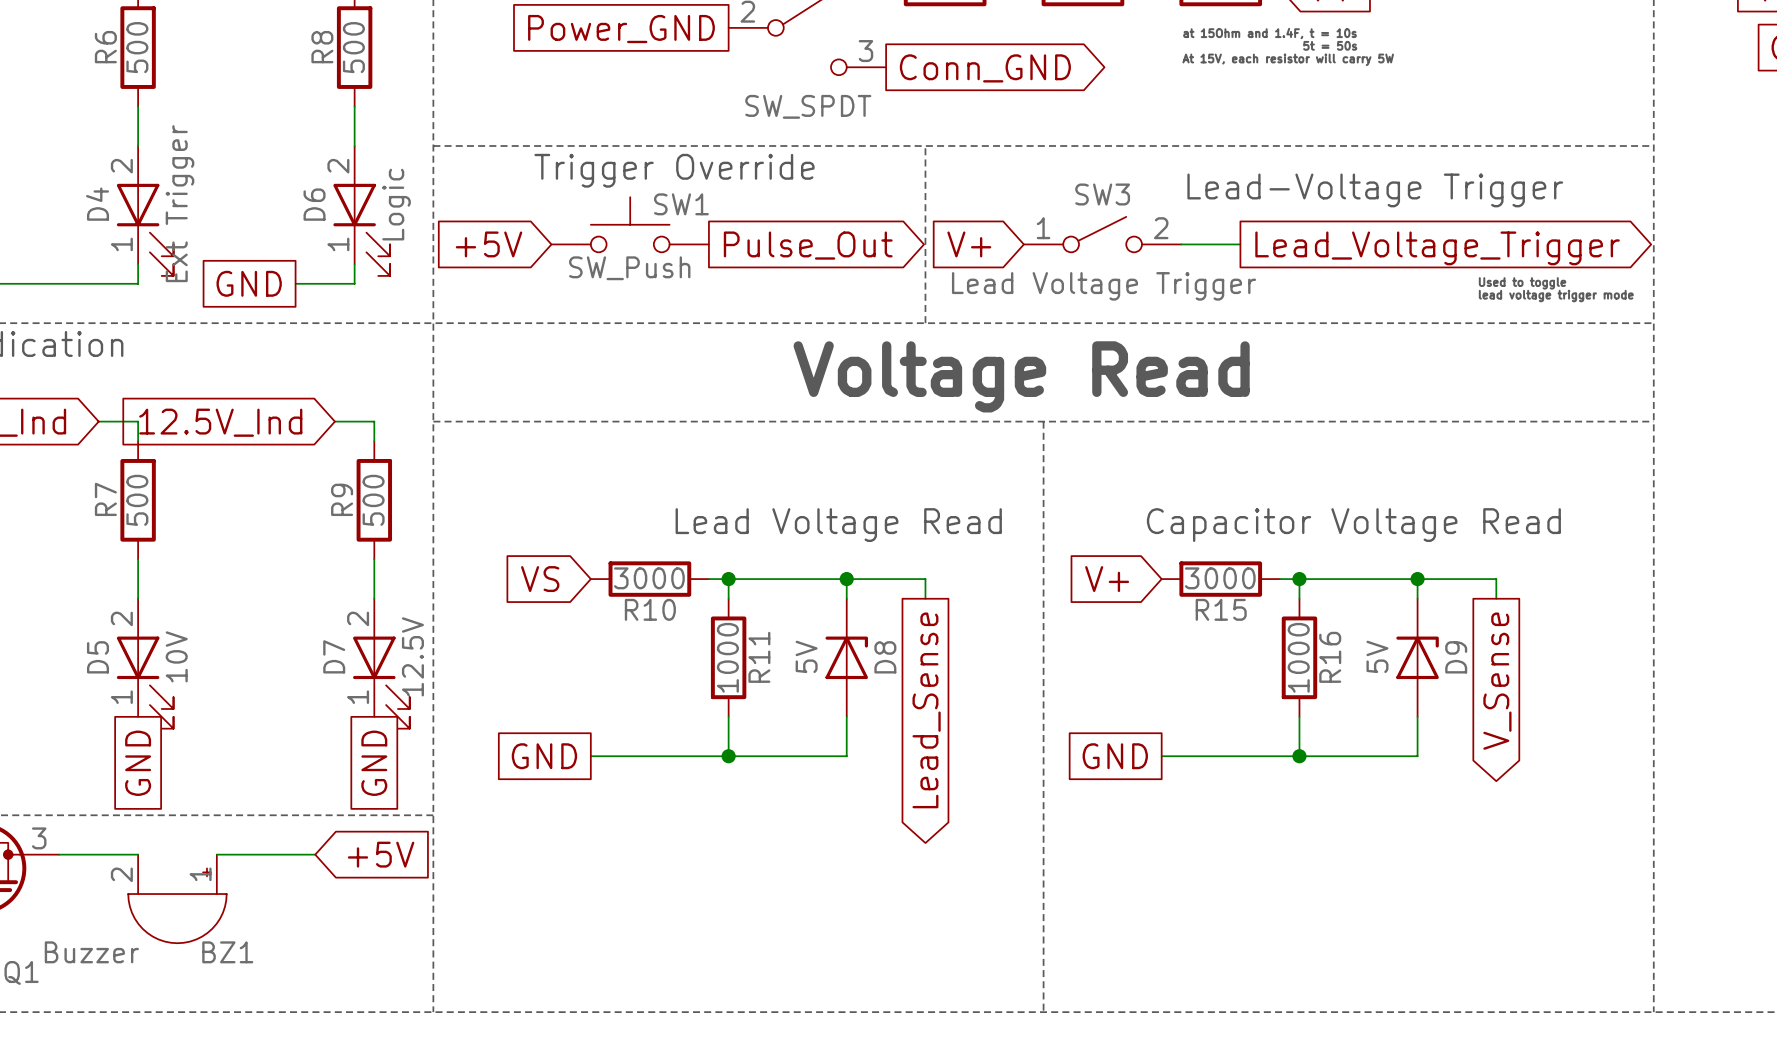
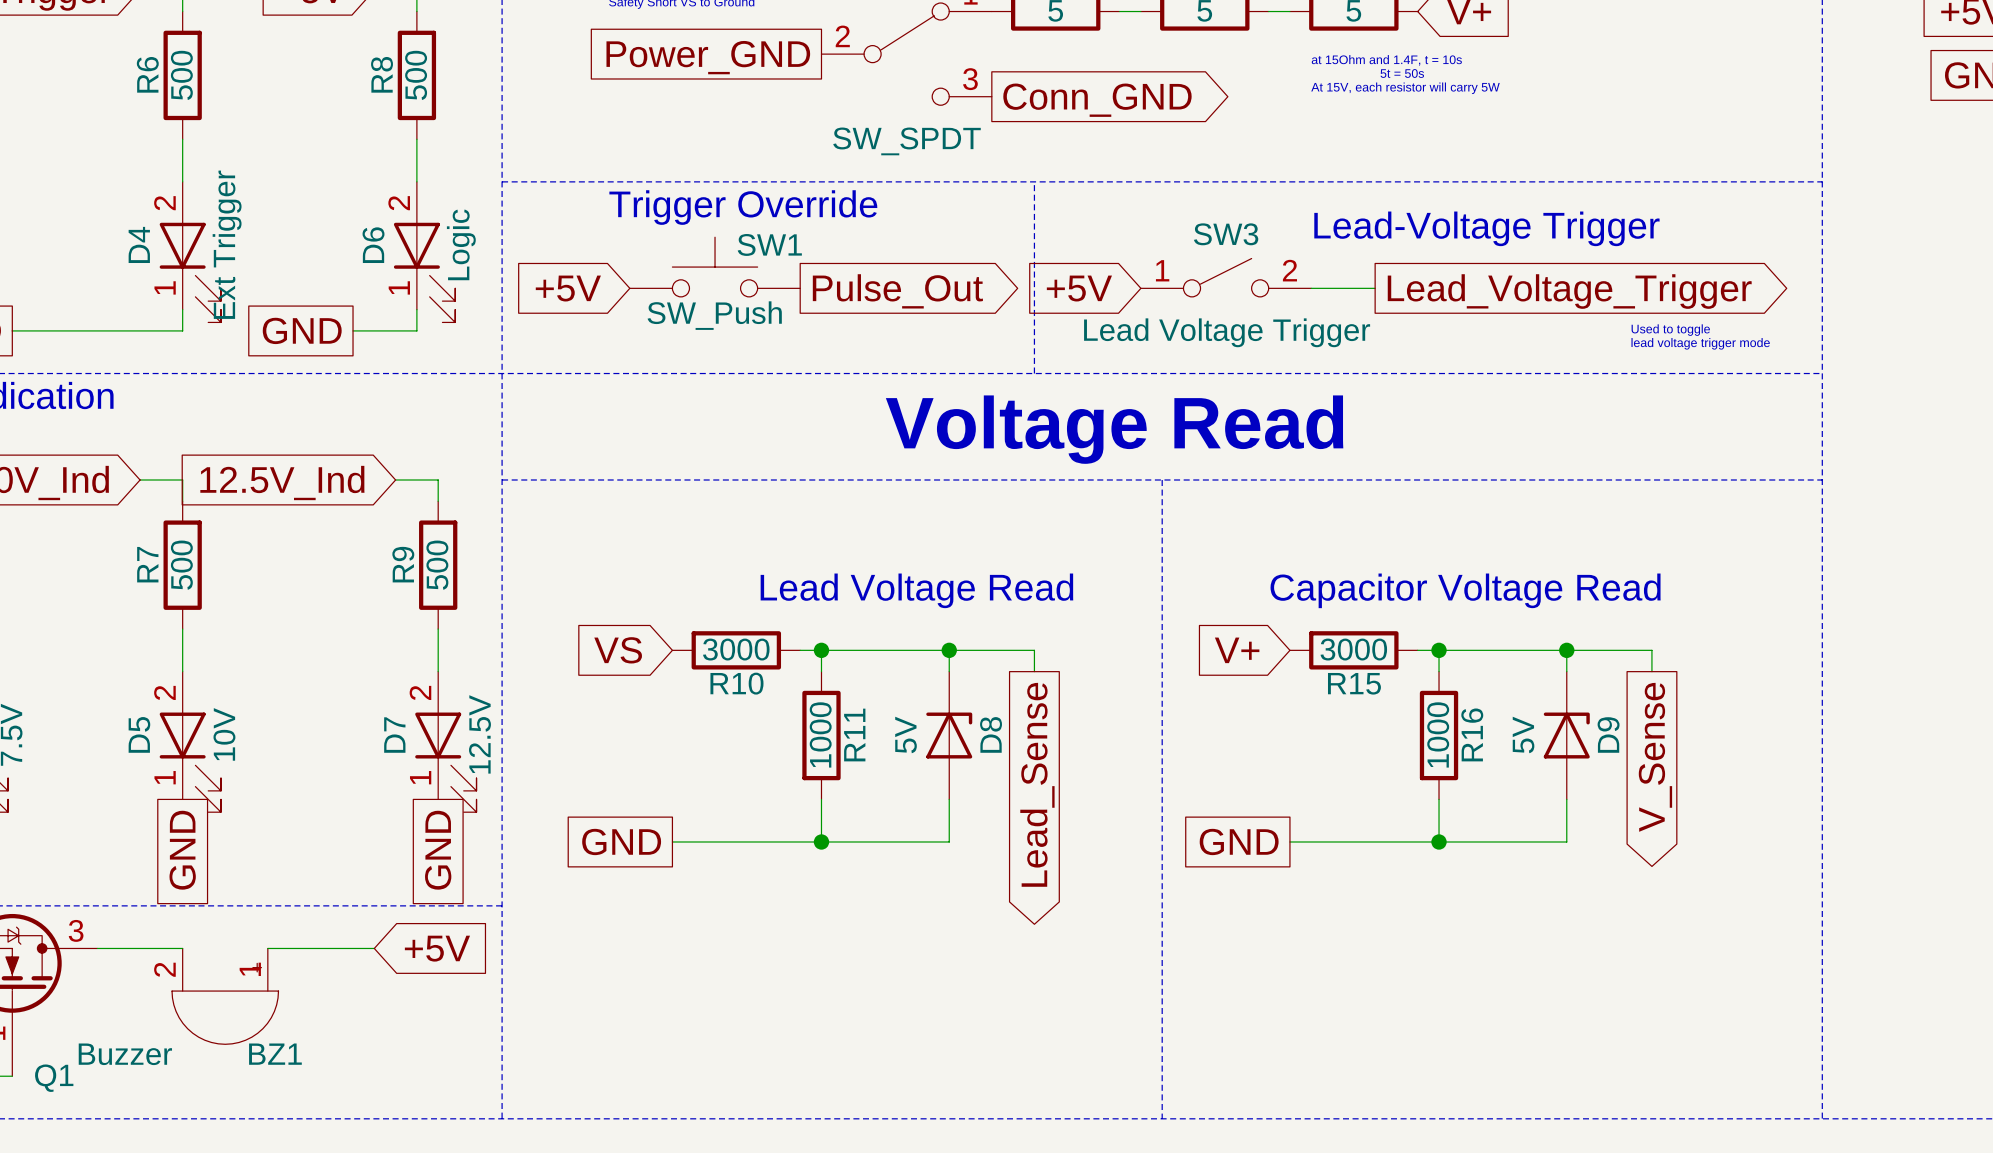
global label: V+ (969, 244) -> +5V (1079, 288)

